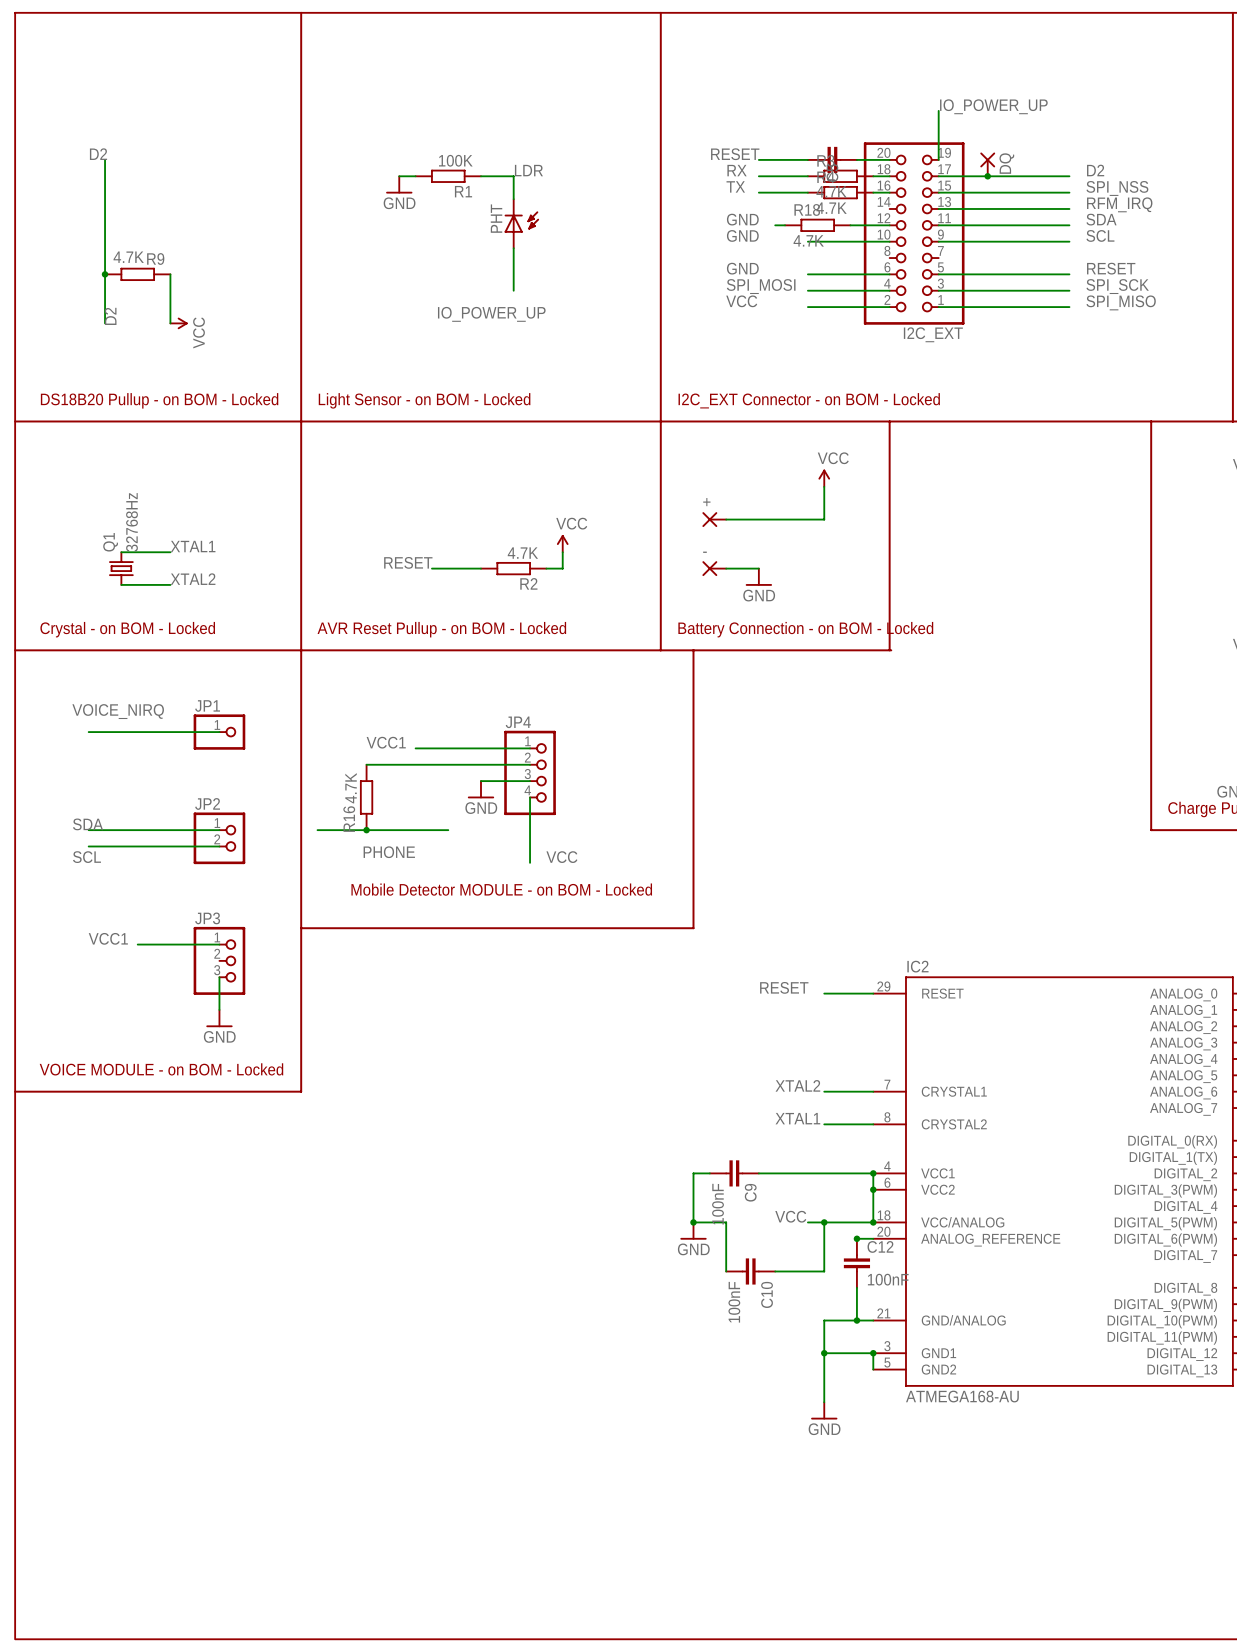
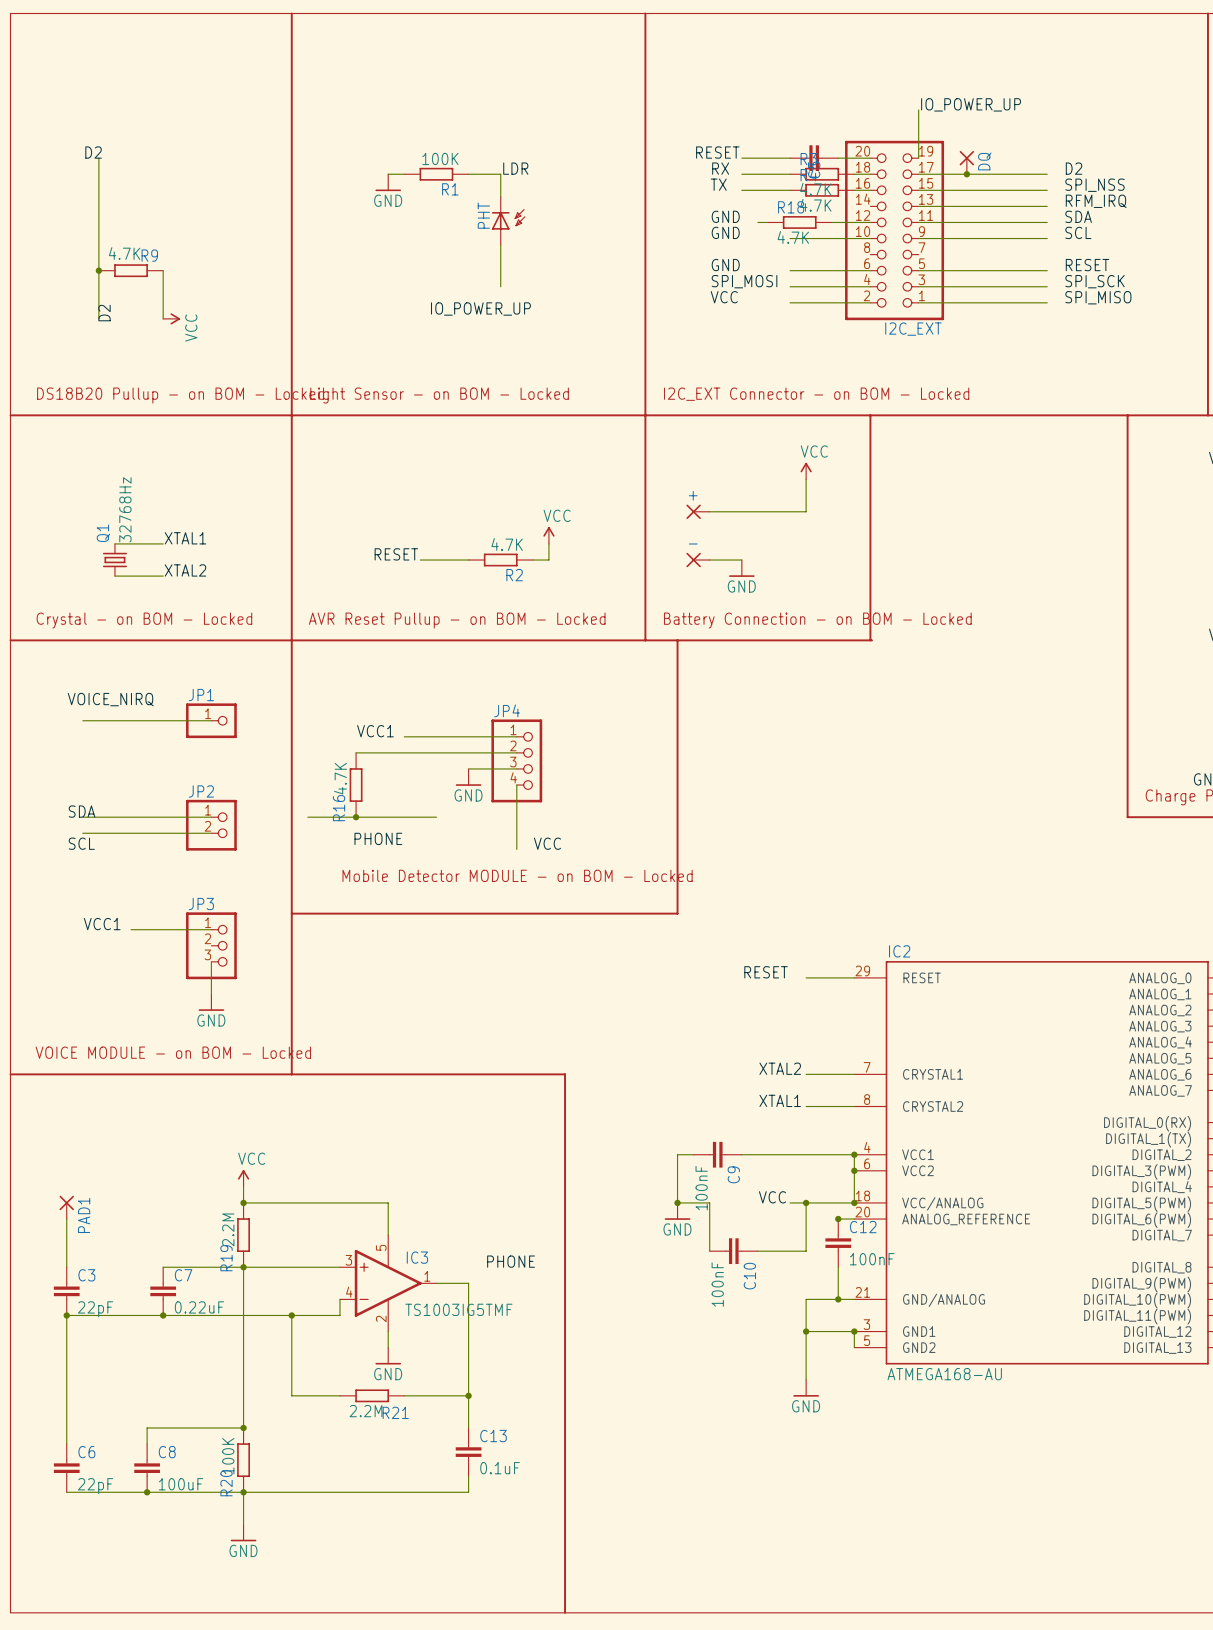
line: none -> (291, 1074) (565, 1074) (565, 1612)
power symbol: none -> VCC (243, 1178)
wire: none -> (243, 1186) (243, 1202) (388, 1202) (388, 1235)
junction: none -> (243, 1202)
PAD1: none -> (66, 1207)
wire: none -> (66, 1219) (66, 1267)
R19: none -> 2.2M (243, 1235)
label: none -> PHONE (511, 1261)
wire: none -> (163, 1267) (339, 1267)
wire: none -> (243, 1267) (243, 1427) (147, 1427) (147, 1444)
junction: none -> (243, 1267)
IC3: none -> TS1003IG5TMF (388, 1283)
wire: none -> (436, 1283) (468, 1283) (468, 1427)
C3: none -> 22pF (66, 1291)
C7: none -> 0.22uF (163, 1291)
wire: none -> (339, 1299) (339, 1315) (66, 1315) (66, 1444)
junction: none -> (66, 1315)
junction: none -> (163, 1315)
wire: none -> (291, 1315) (291, 1395) (339, 1395)
junction: none -> (291, 1315)
wire: none -> (388, 1331) (388, 1347)
power symbol: none -> GND (388, 1356)
R21: none -> 2.2M (372, 1395)
wire: none -> (404, 1395) (468, 1395)
junction: none -> (468, 1395)
junction: none -> (243, 1427)
C13: none -> 0.1uF (468, 1452)
R20: none -> 100K (243, 1460)
C6: none -> 22pF (66, 1468)
C8: none -> 100uF (147, 1468)
wire: none -> (468, 1476) (468, 1492) (66, 1492)
junction: none -> (147, 1492)
wire: none -> (243, 1492) (243, 1524)
junction: none -> (243, 1492)
power symbol: none -> GND (243, 1532)

